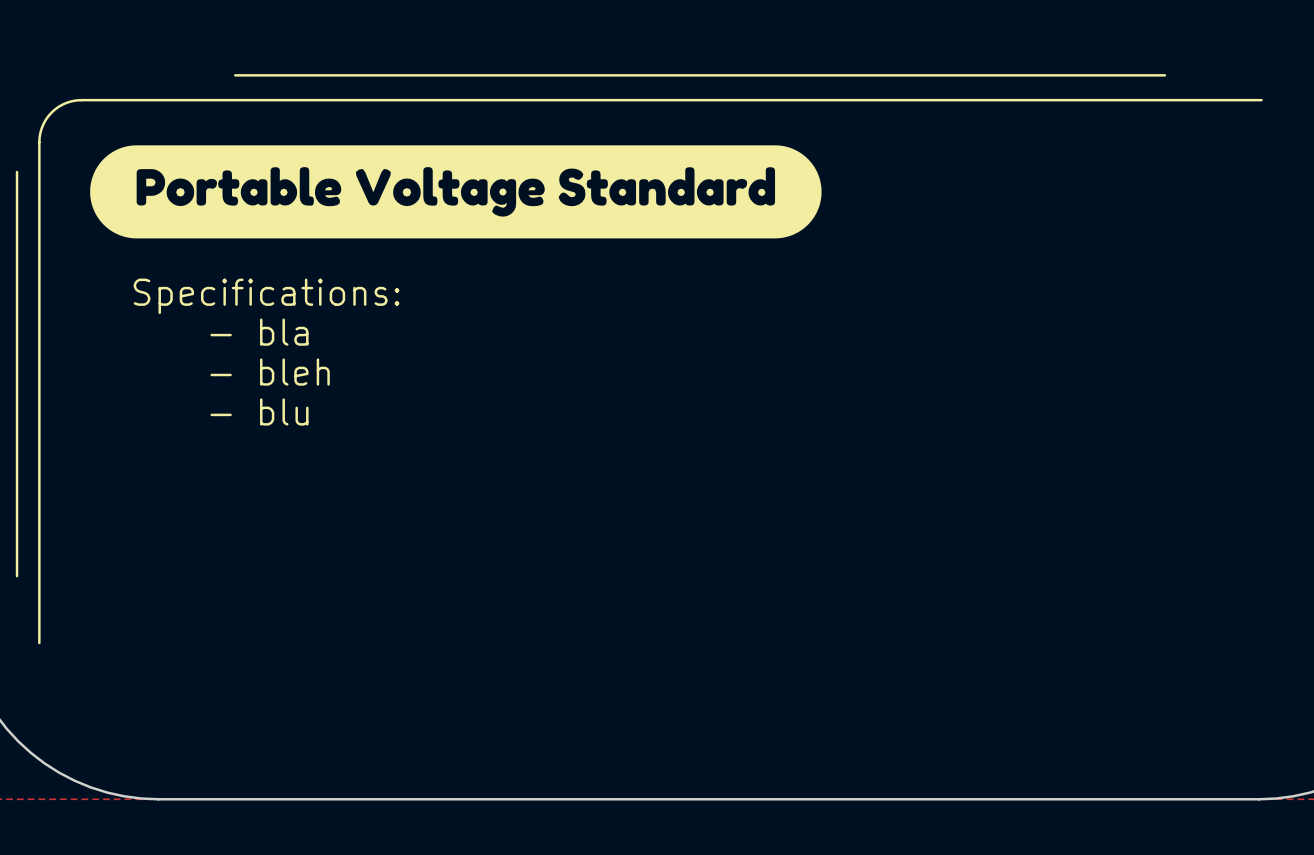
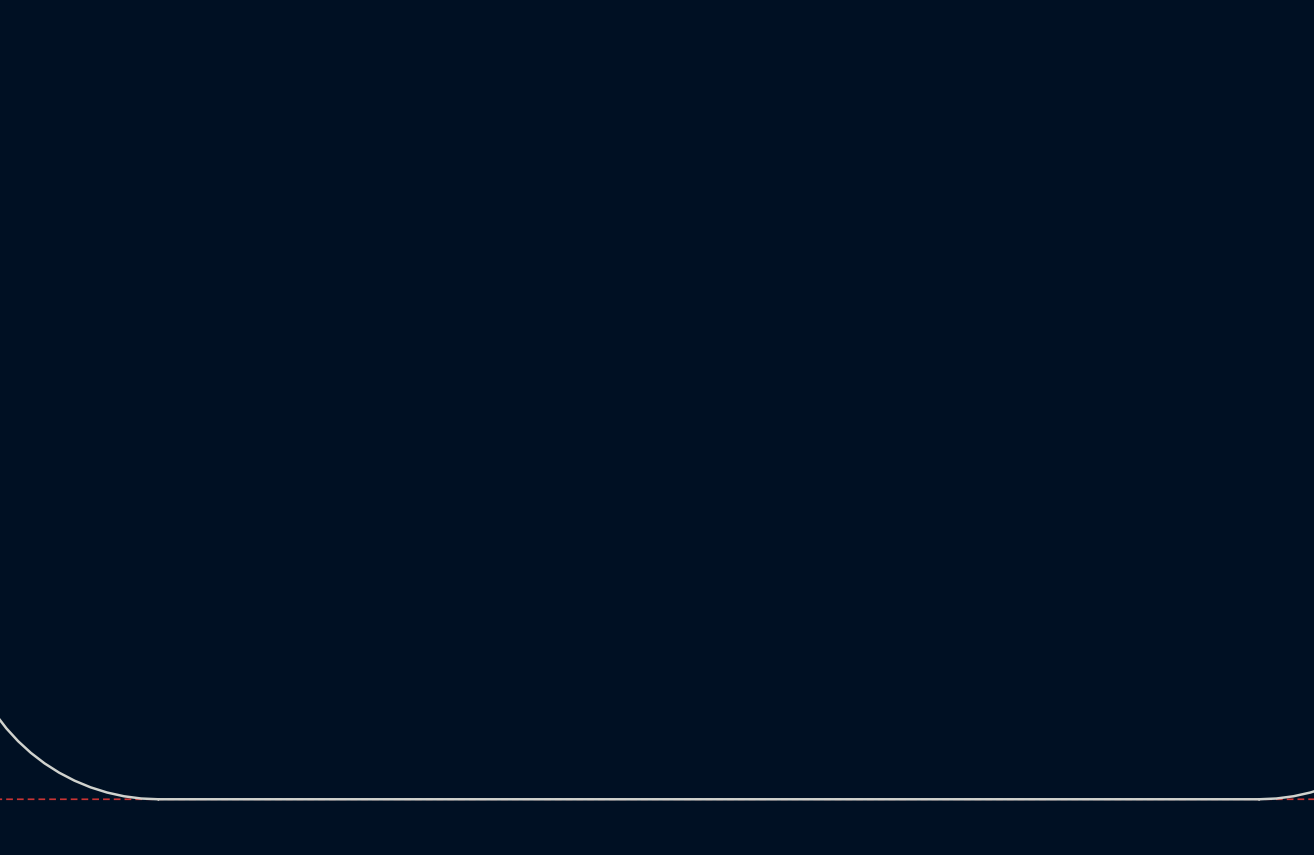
line: (235, 75) (1164, 75) -> none
line: (1261, 100) (81, 100) (63, 104) (51, 112) (45, 119) (41, 128) (39, 142) (39, 643) -> none
drawing: [90, 145, 822, 239] -> none
line: (17, 172) (17, 576) -> none
text: Specifications: (266, 296) -> none
text: - bla (259, 332) -> none
text: - bleh (270, 372) -> none
text: - blu (259, 411) -> none

